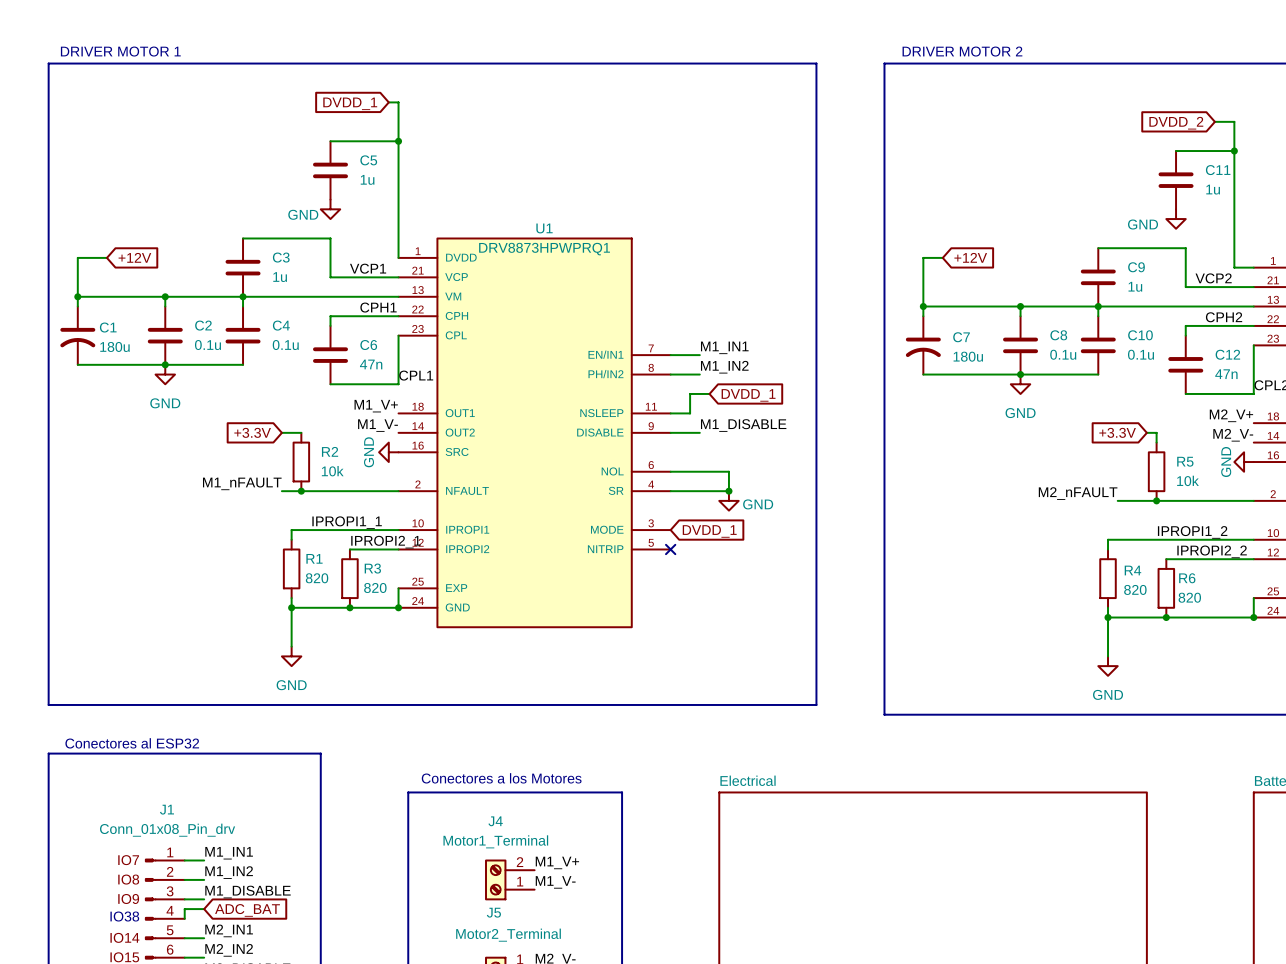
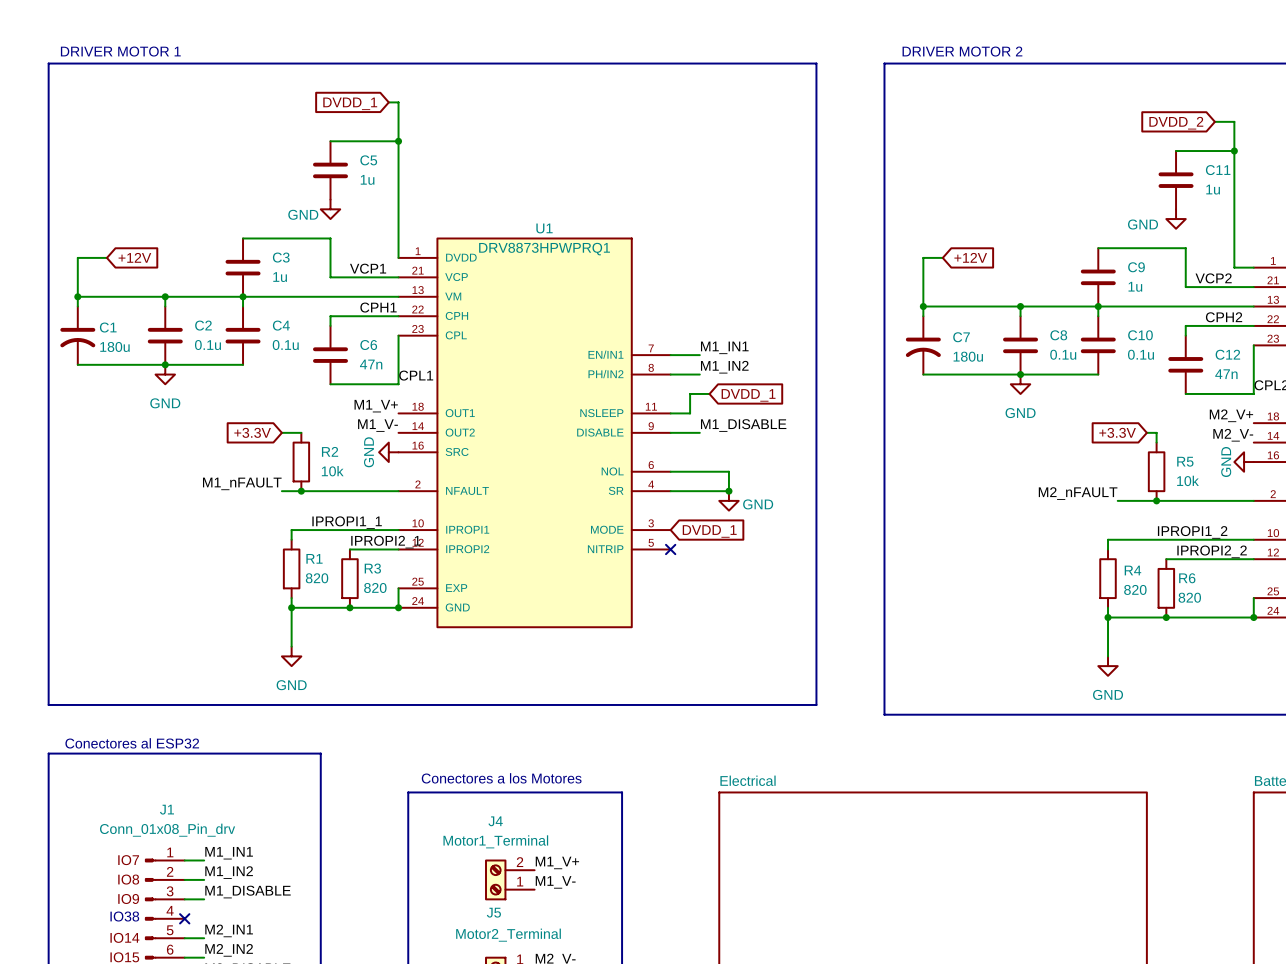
wire: (204, 909) (184, 909) (184, 918) -> none
global label: ADC_BAT (247, 910) -> none
no-connect mark: none -> (184, 918)

